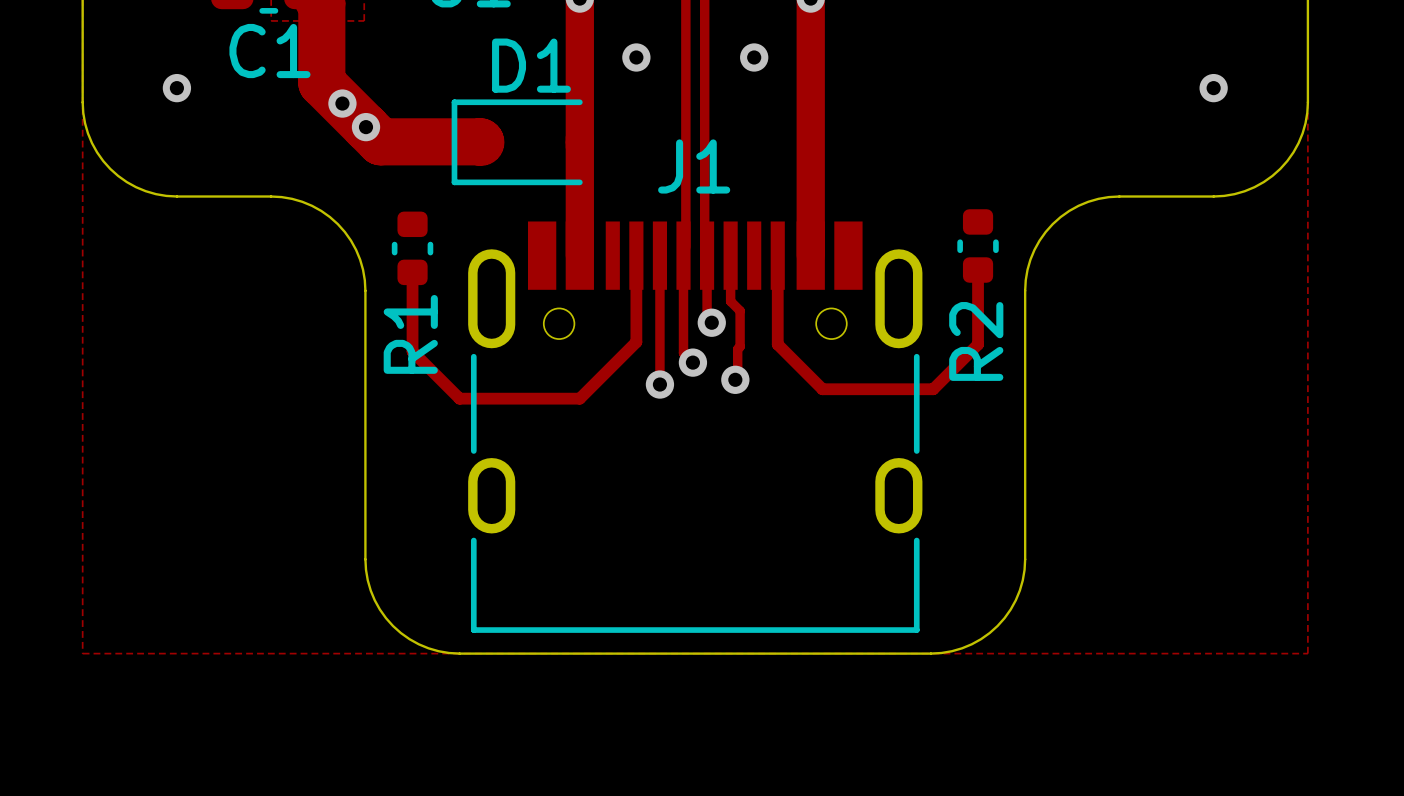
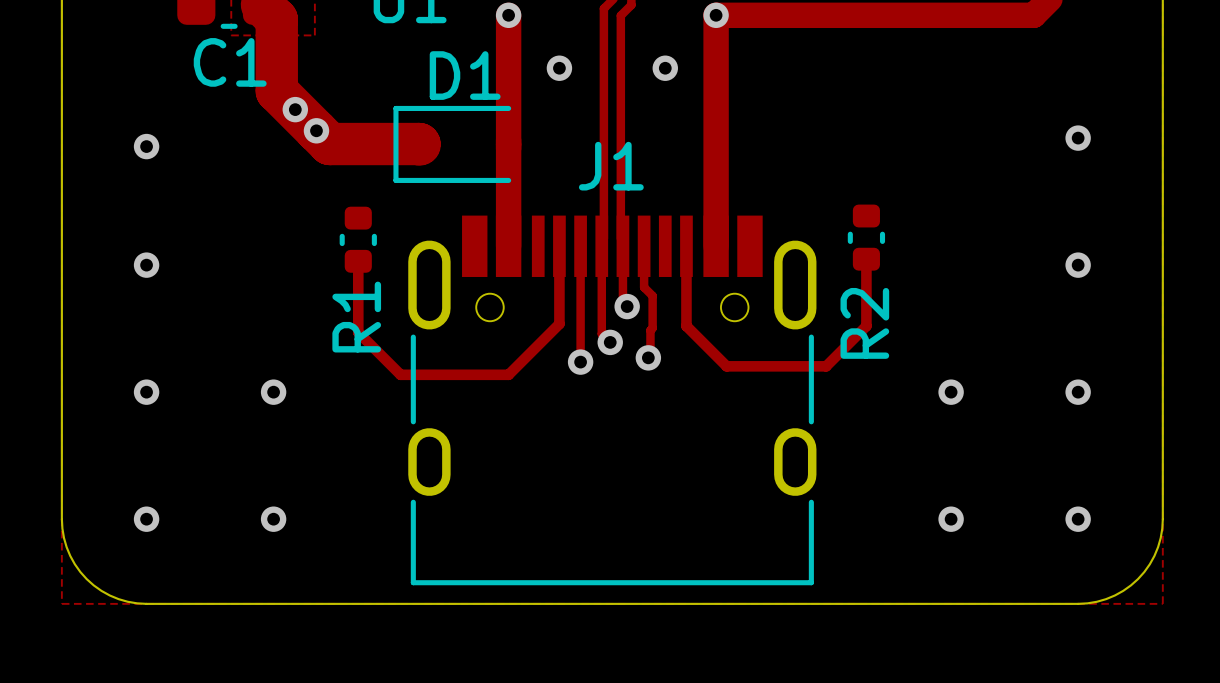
via position: (176, 88) -> (146, 146)
via position: (1213, 88) -> (1078, 138)
board edge: (82, 102) (85, 123) (97, 152) (118, 175) (136, 187) (166, 195) (271, 196) (292, 198) (312, 205) (329, 217) (350, 240) (363, 269) (365, 290) (365, 559) (367, 580) (379, 609) (400, 633) (428, 648) (459, 653) -> (61, 108) (61, 519) (64, 538) (74, 564) (86, 579) (101, 590) (118, 599) (137, 603) (400, 603)
board edge: (1307, 102) (1302, 133) (1293, 152) (1272, 175) (1254, 187) (1224, 195) (1119, 196) (1098, 198) (1069, 210) (1052, 224) (1039, 240) (1027, 269) (1025, 290) (1025, 559) (1022, 580) (1010, 609) (989, 633) (962, 648) (930, 653) -> (1162, 108) (1162, 519) (1158, 547) (1149, 564) (1138, 579) (1123, 590) (1106, 599) (1087, 603) (824, 603)
via: none -> (146, 265)
via: none -> (1078, 265)
via: none -> (146, 392)
via: none -> (273, 392)
via: none -> (951, 392)
via: none -> (1078, 392)
via: none -> (146, 519)
via: none -> (273, 519)
via: none -> (951, 519)
via: none -> (1078, 519)

